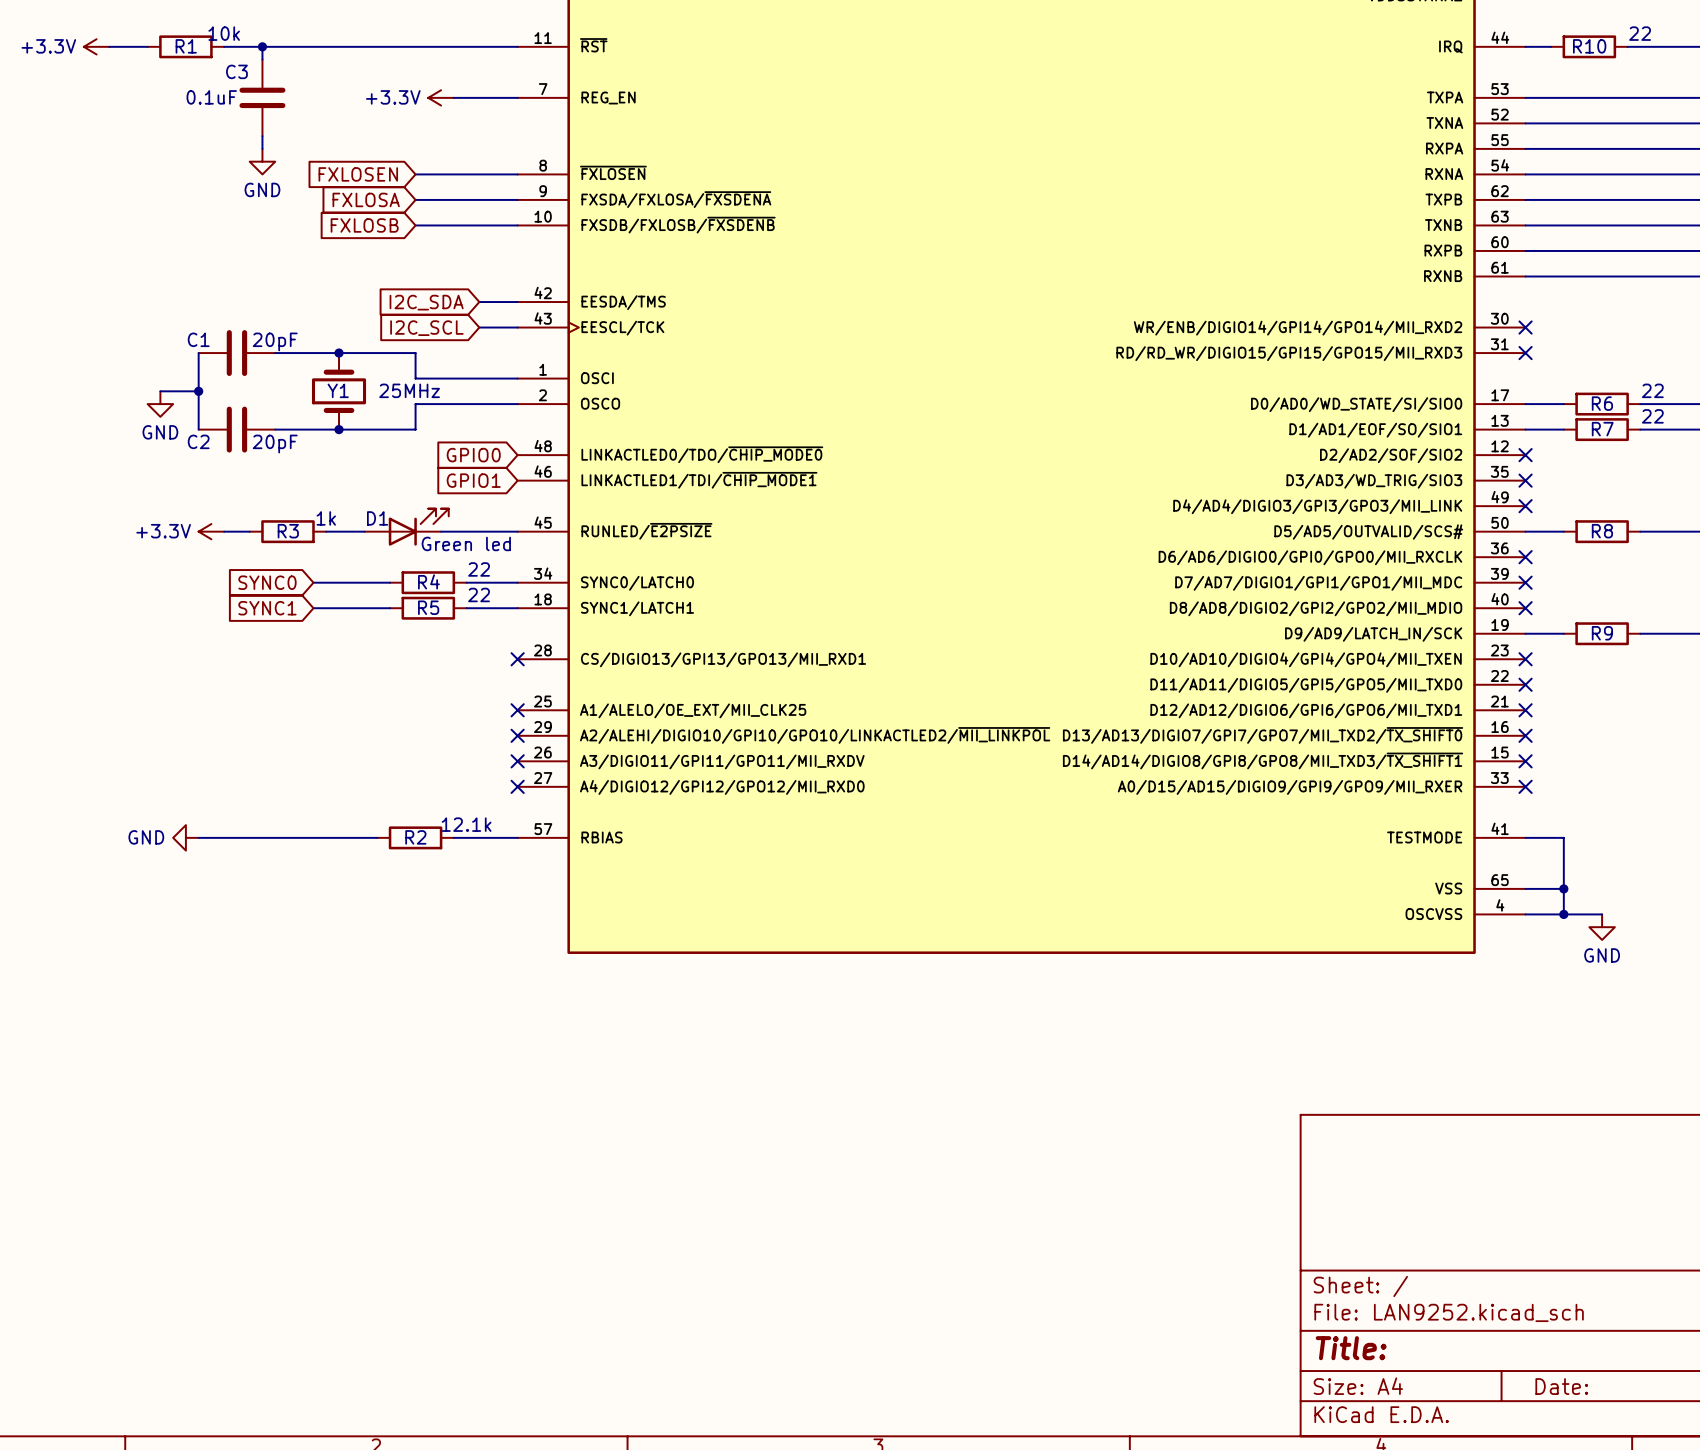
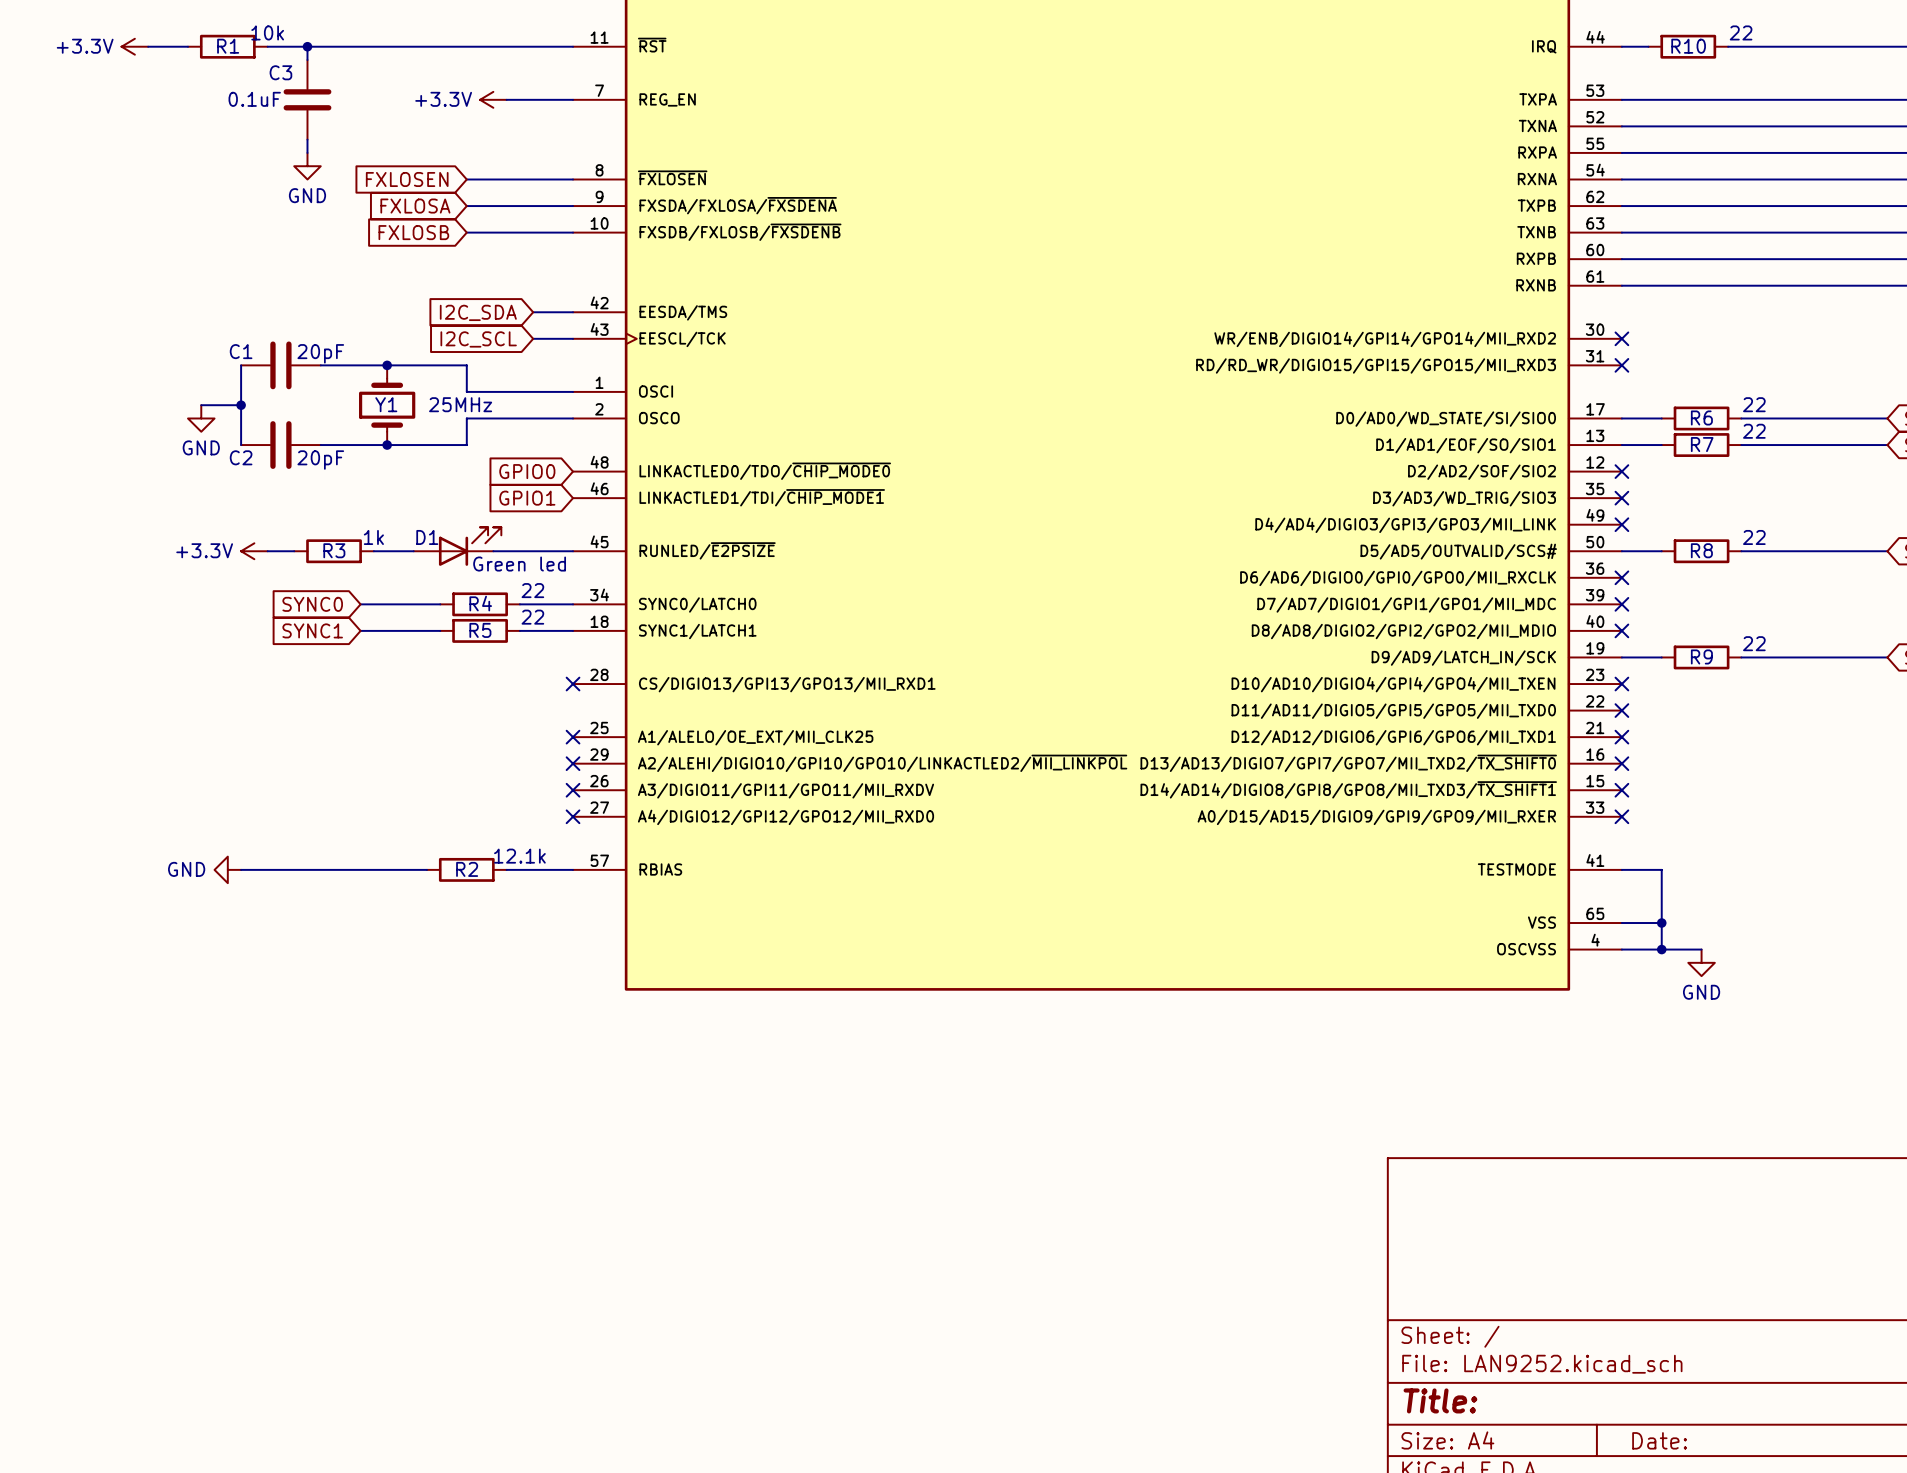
R8 value: none -> 22 (1754, 537)
R9 value: none -> 22 (1754, 643)

